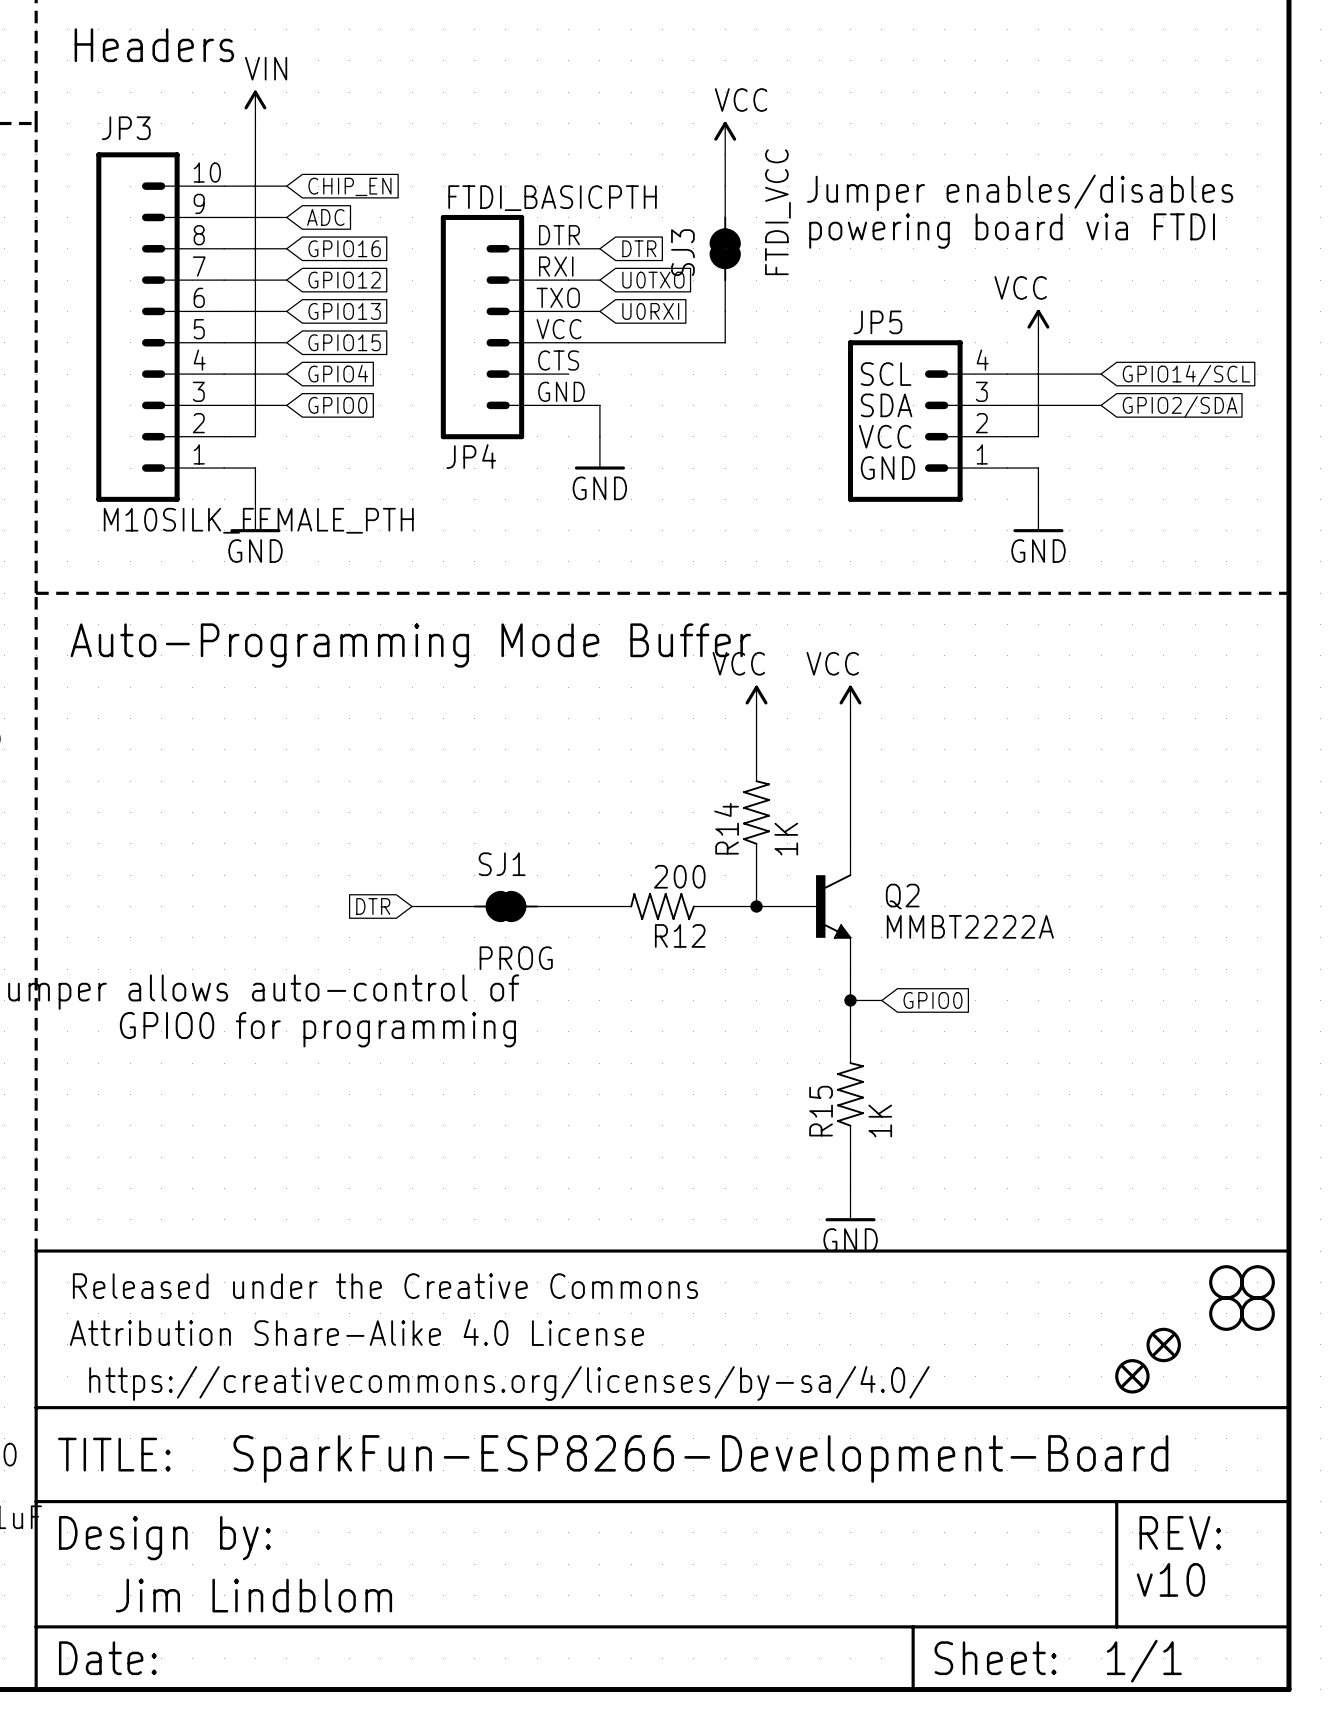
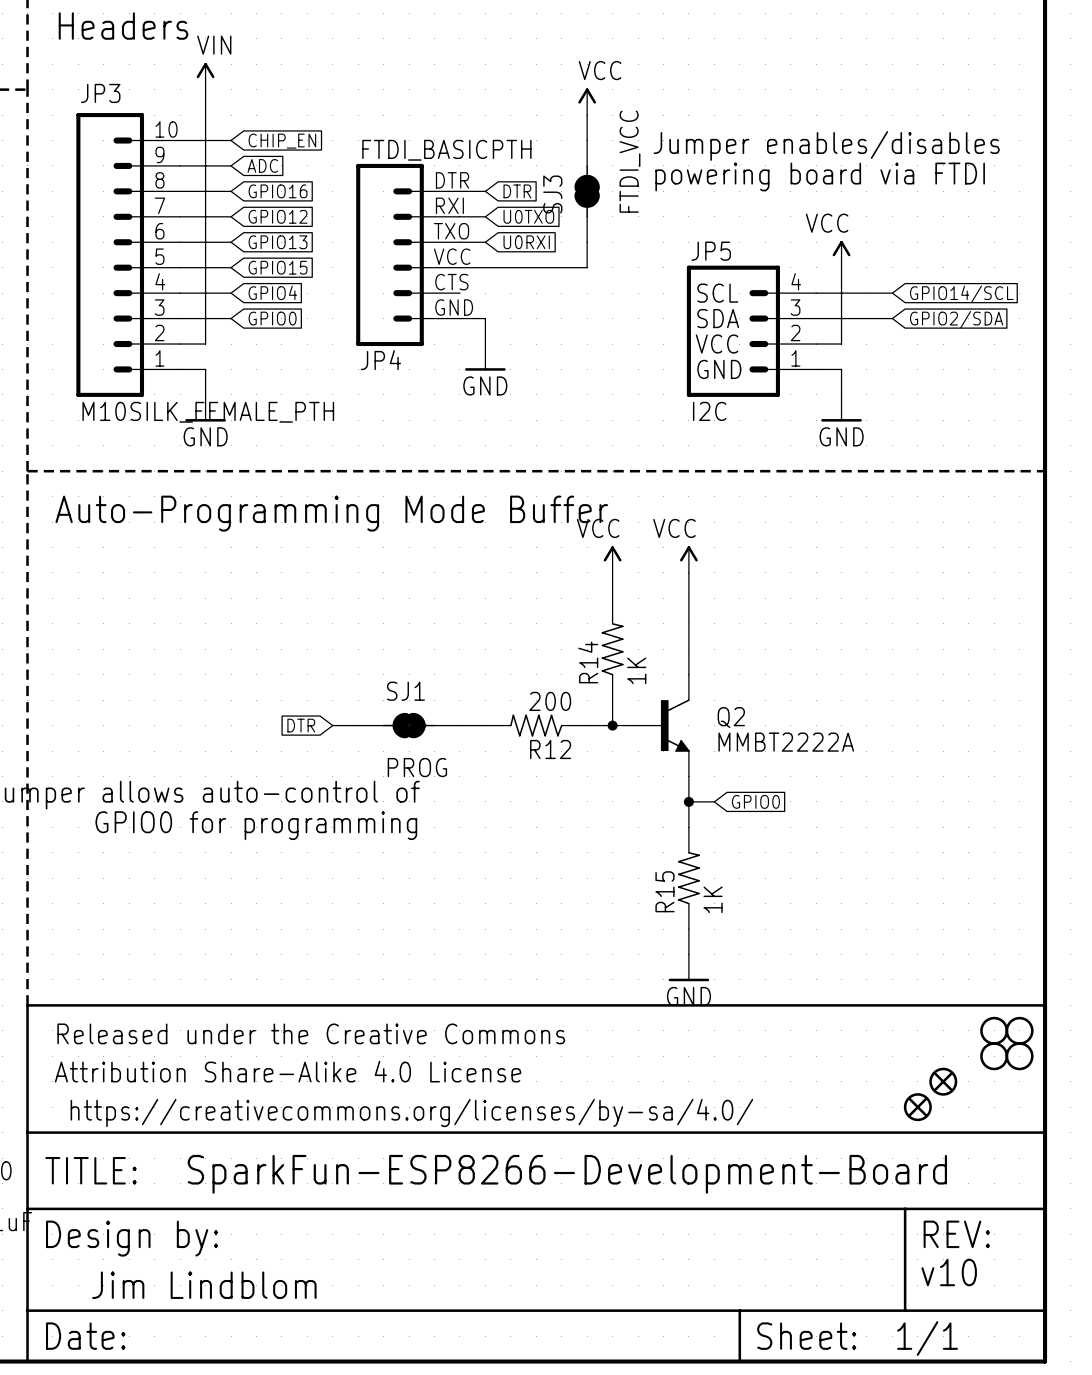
JP5 value: none -> I2C (709, 411)

